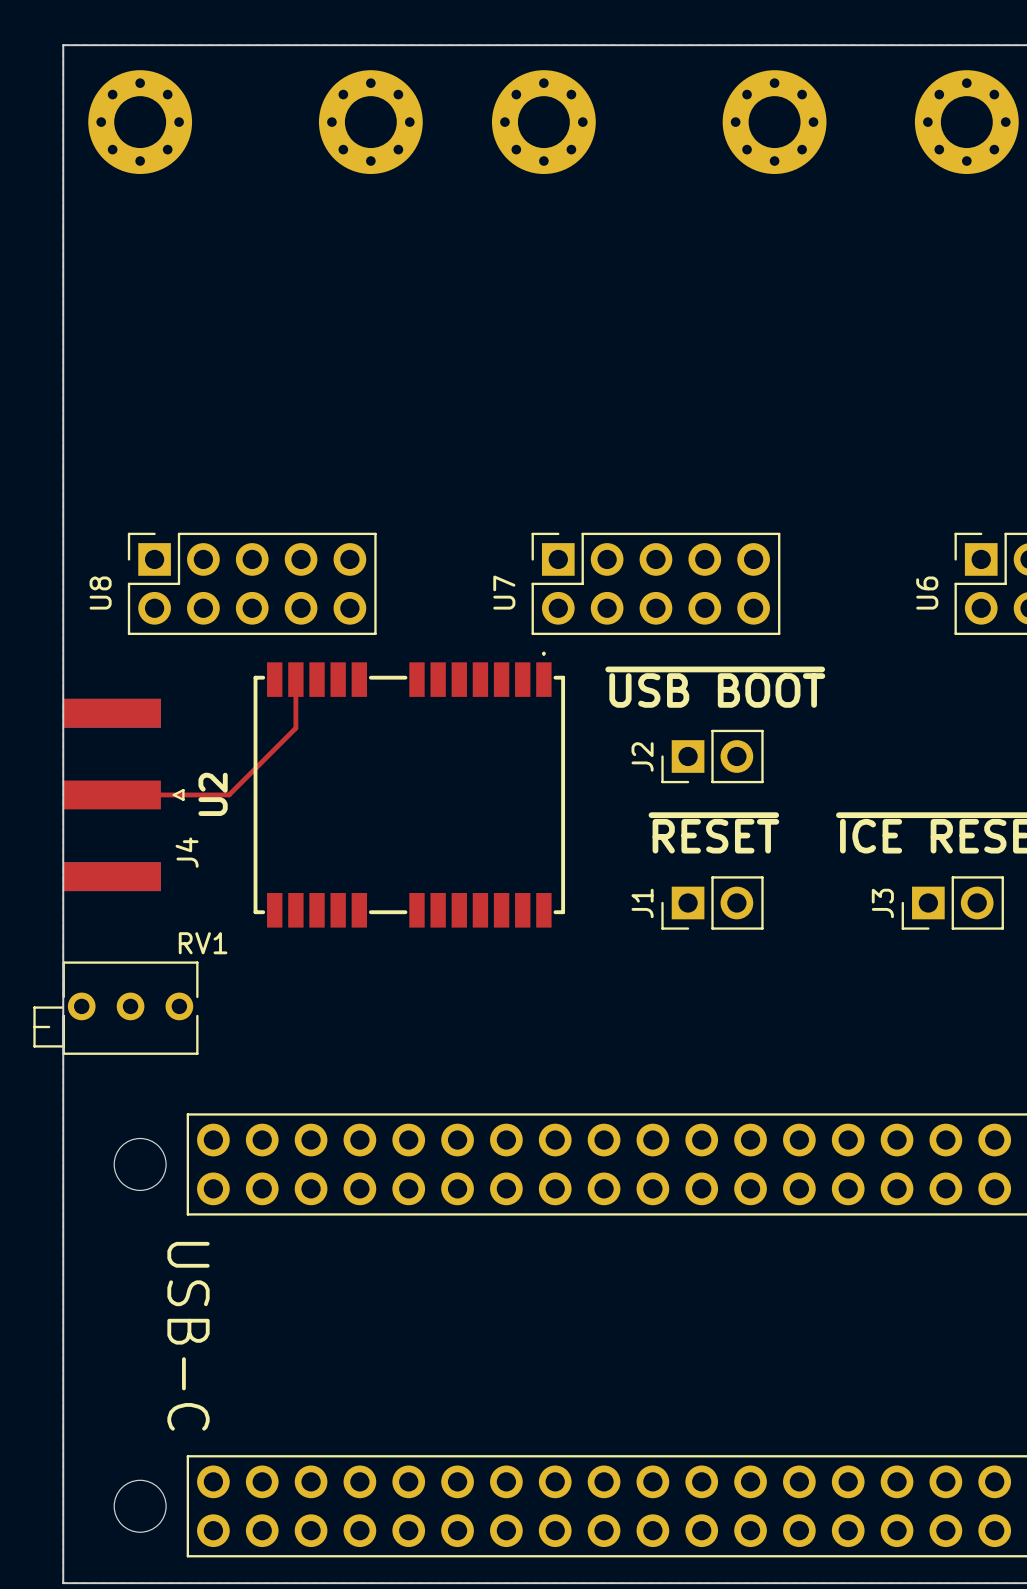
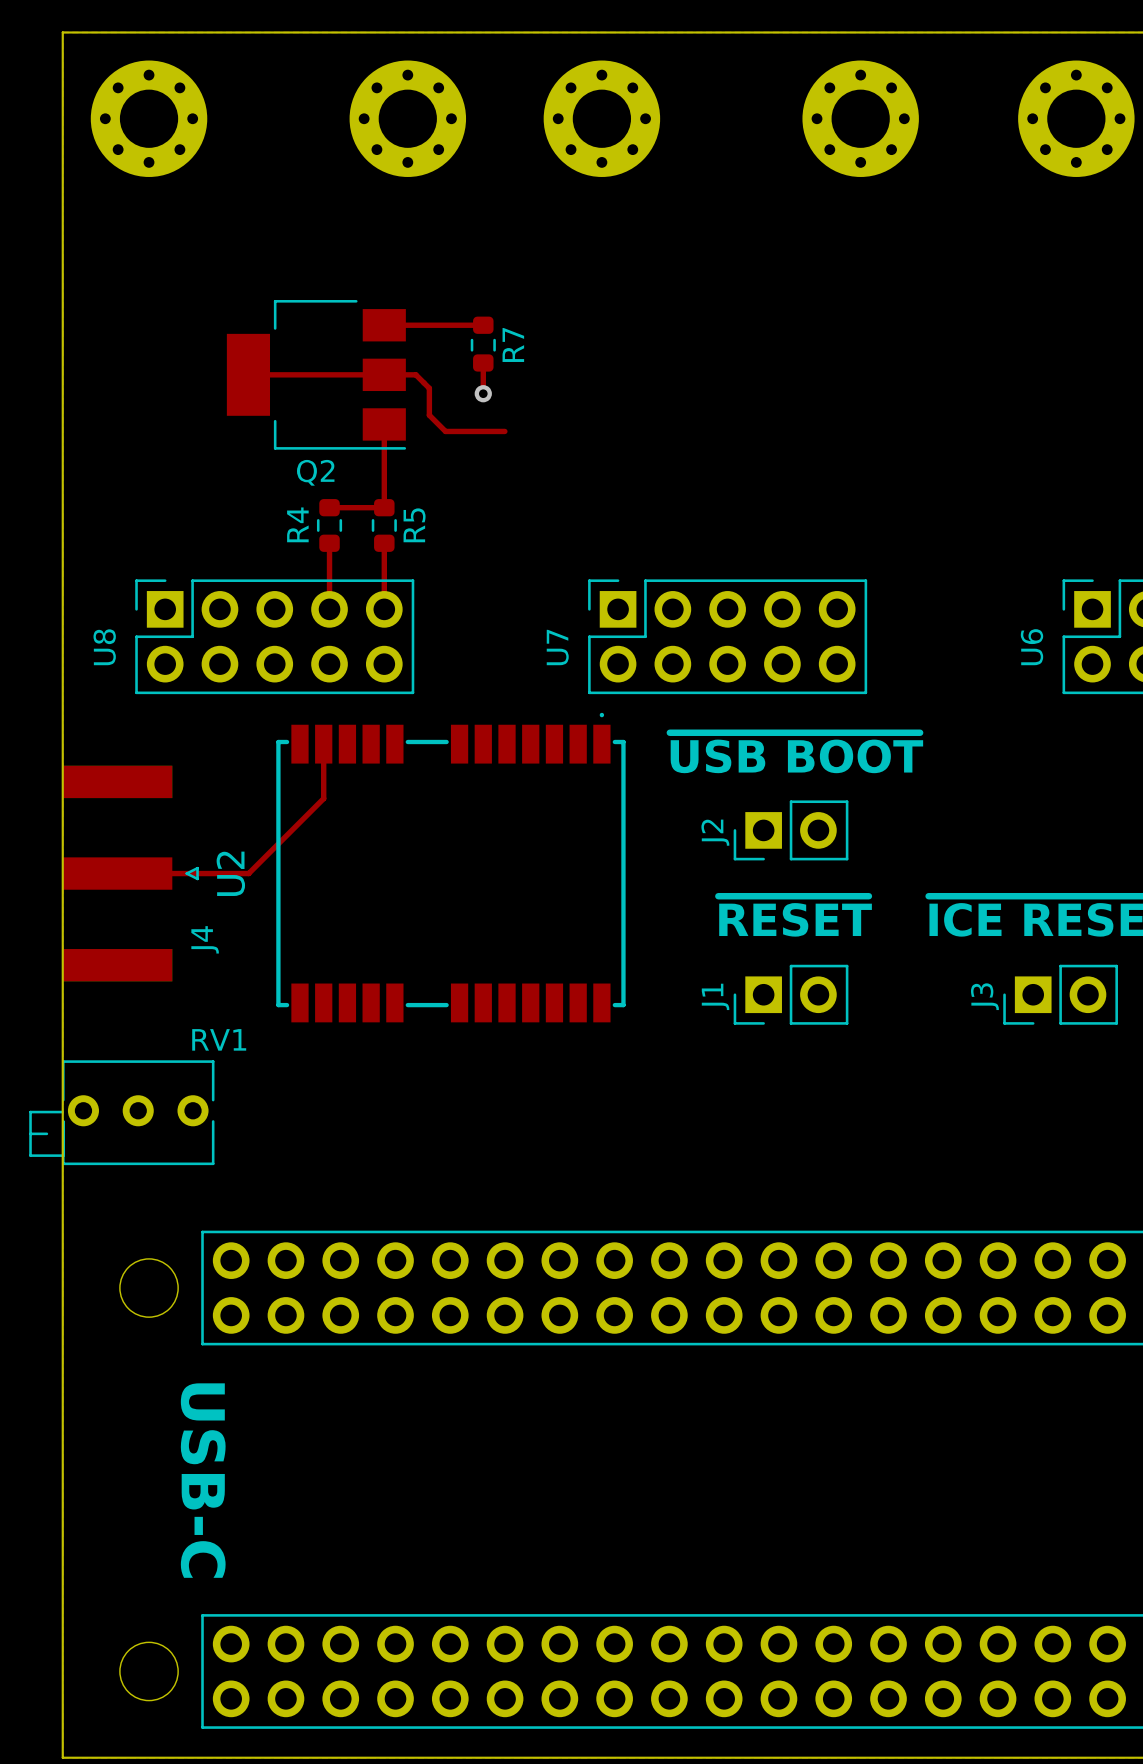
top track: none -> (384, 325) (483, 325)
R7: none -> (483, 344)
top track: none -> (483, 362) (483, 393)
top track: none -> (248, 374) (415, 374) (429, 388) (429, 415) (445, 431) (504, 431)
Q2: none -> (316, 374)
via: none -> (483, 393)
top track: none -> (384, 424) (384, 507) (329, 507)
R4: none -> (329, 525)
R5: none -> (384, 525)
top track: none -> (329, 543) (329, 609)
top track: none -> (384, 543) (384, 609)

